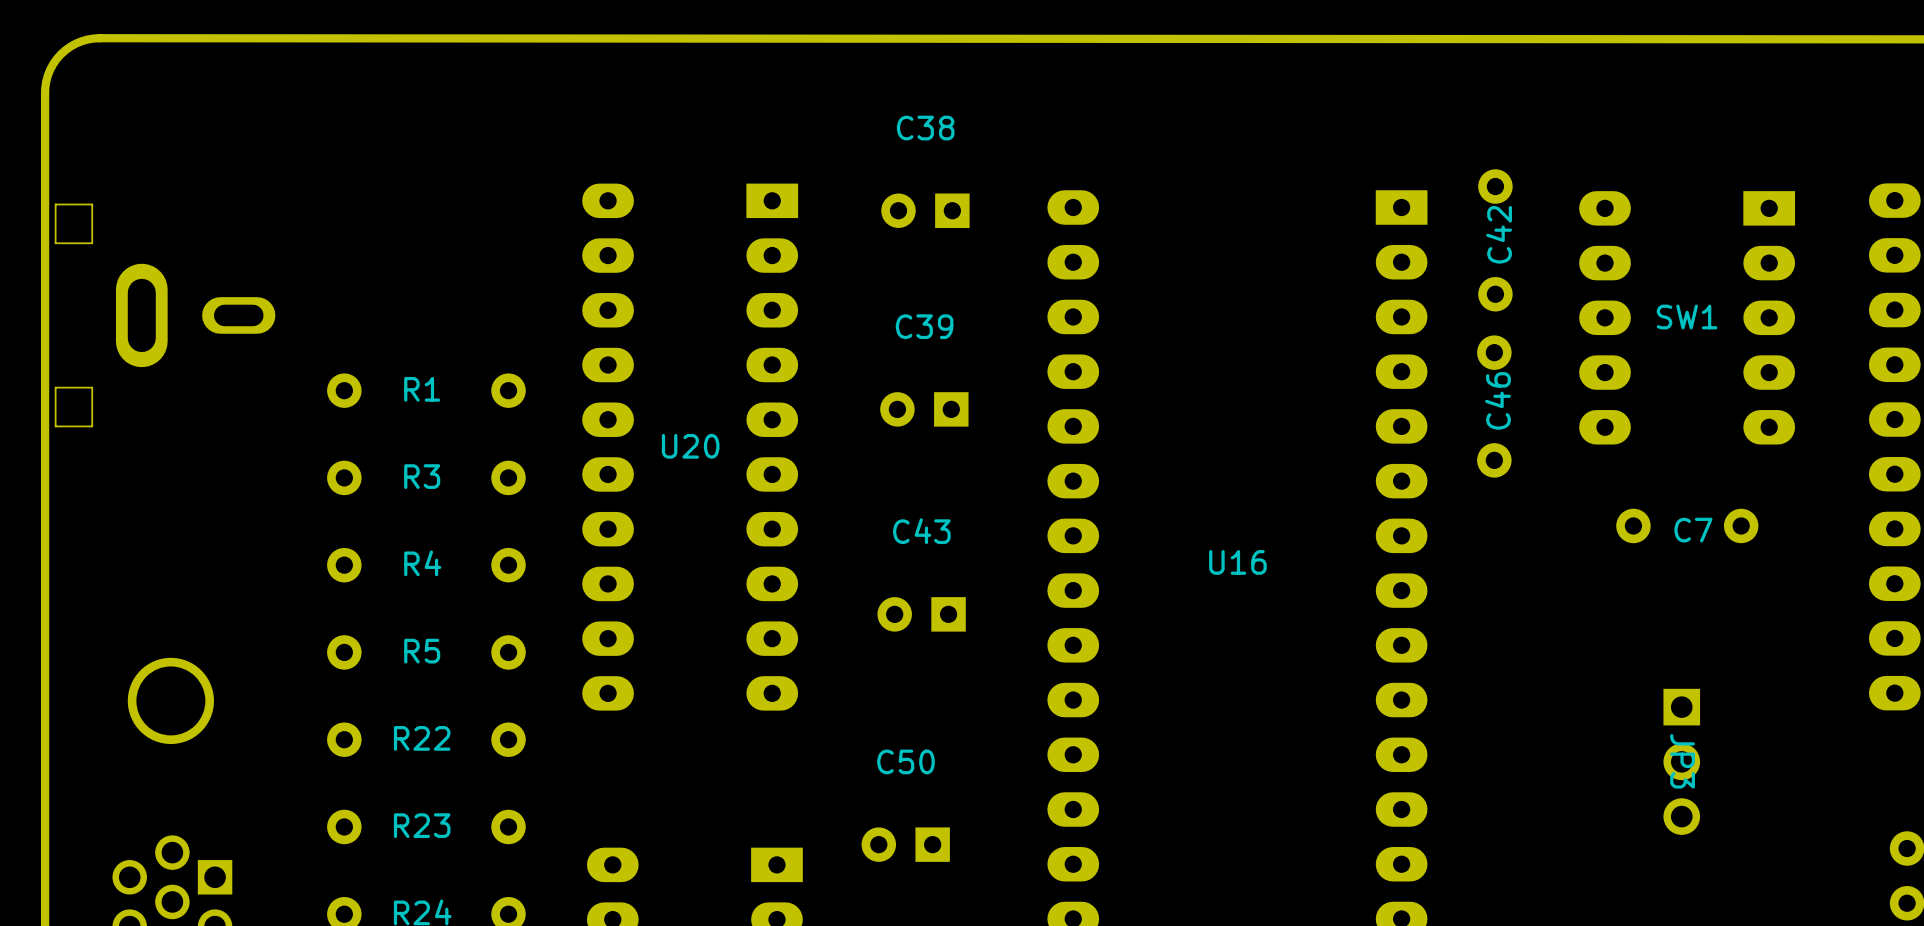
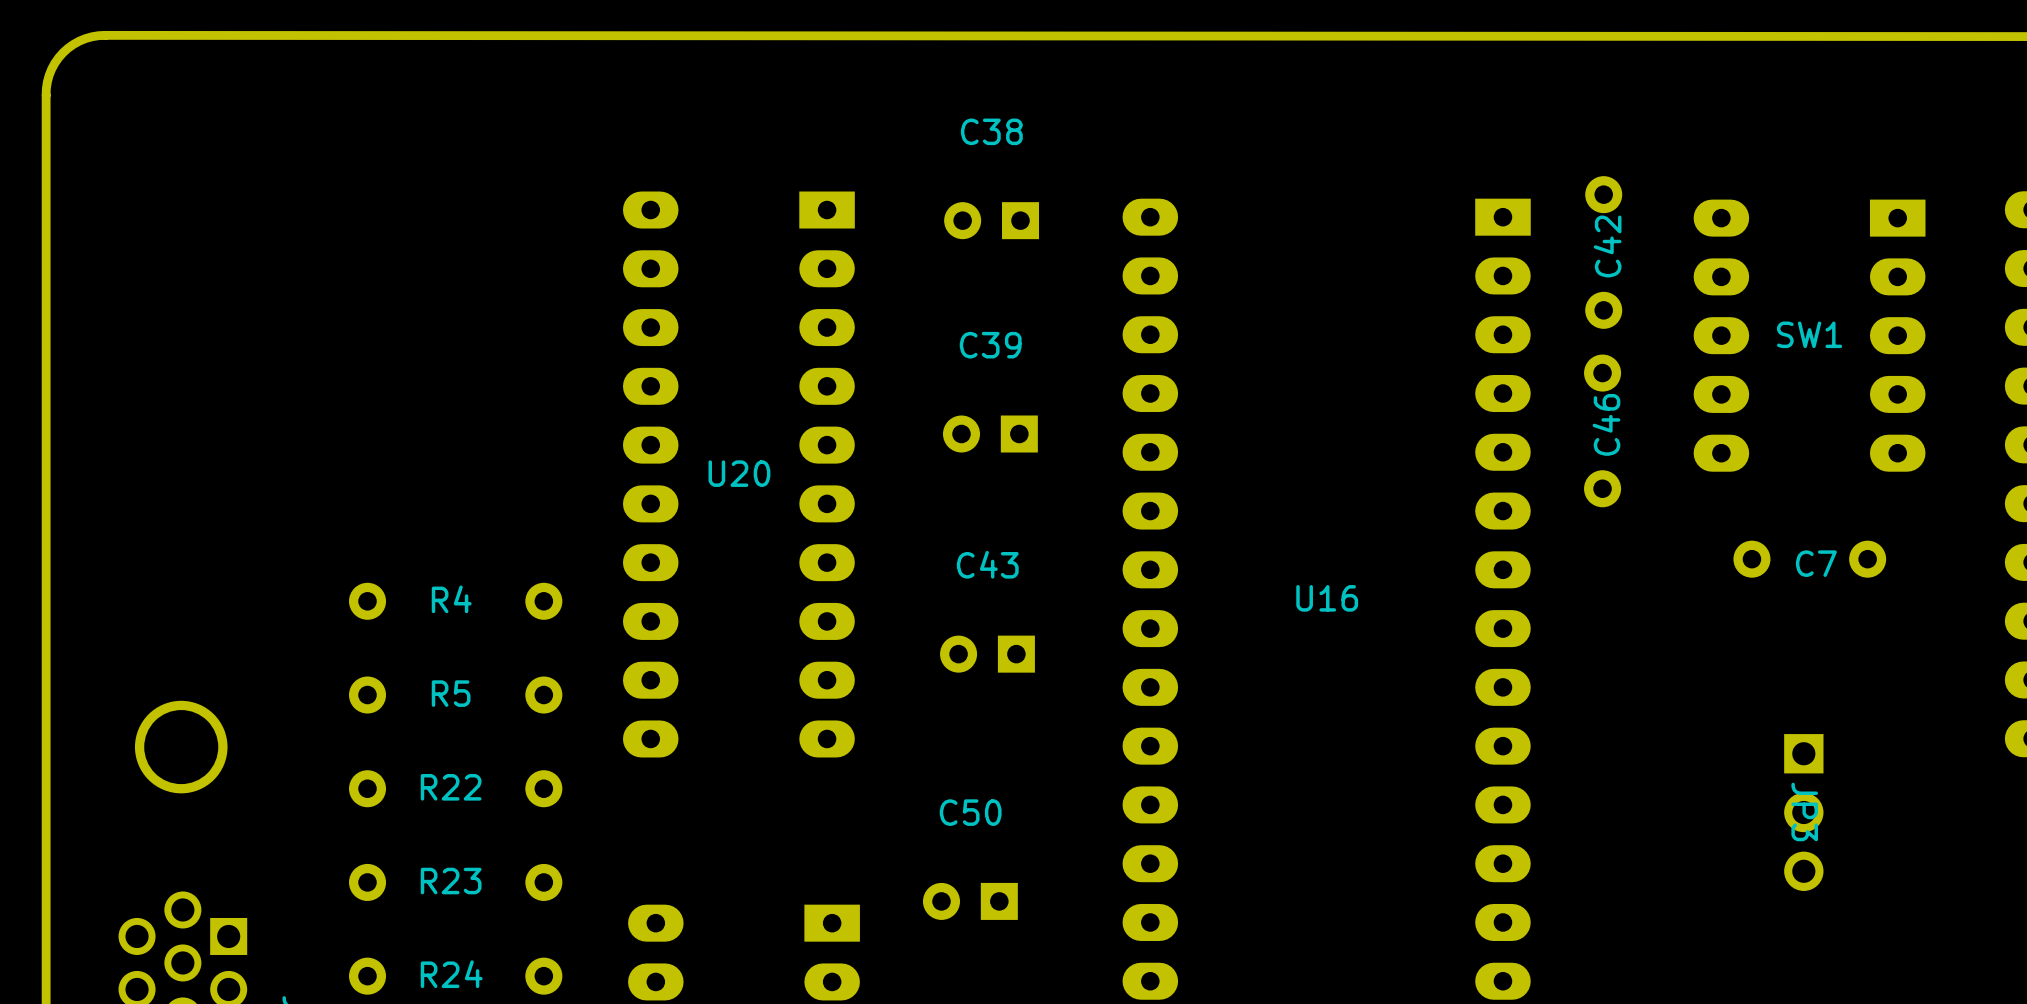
part: (165, 315) -> none
R1: (426, 390) -> none
R3: (426, 477) -> none

